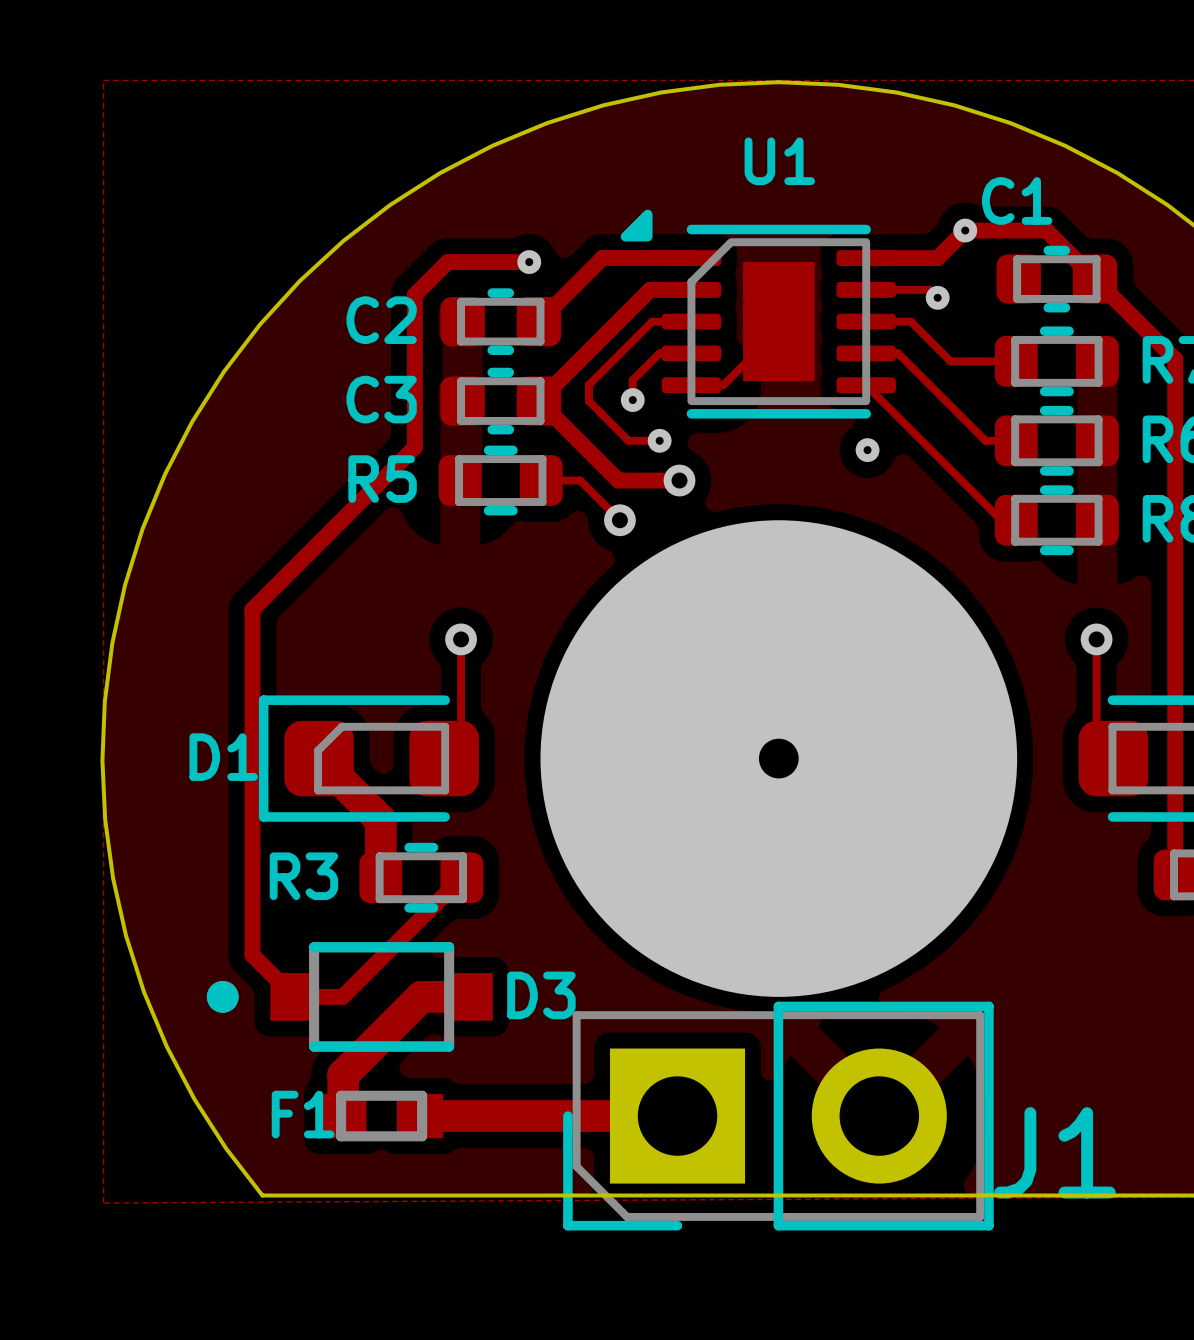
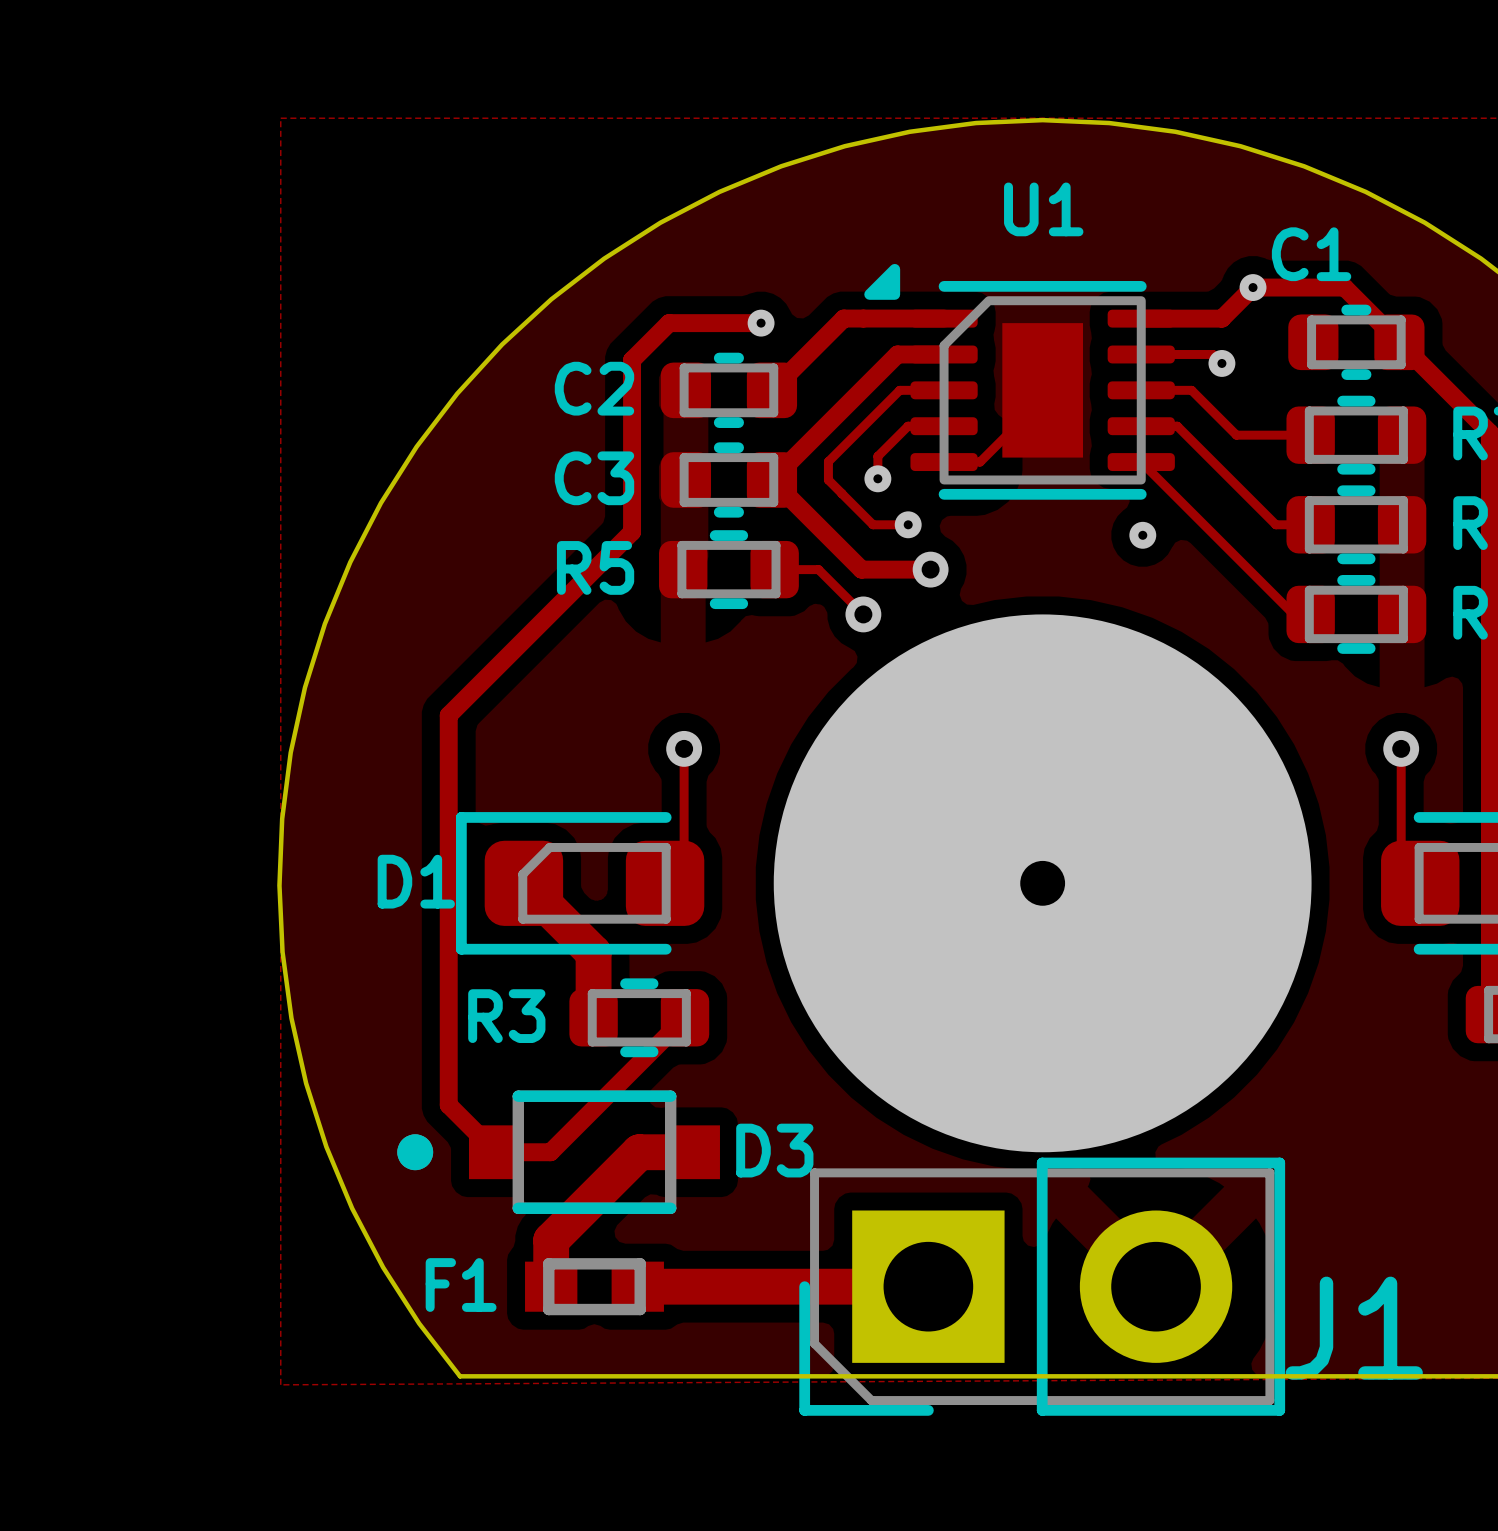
F1 name position: F1 (303, 1114) -> F1 (461, 1285)

